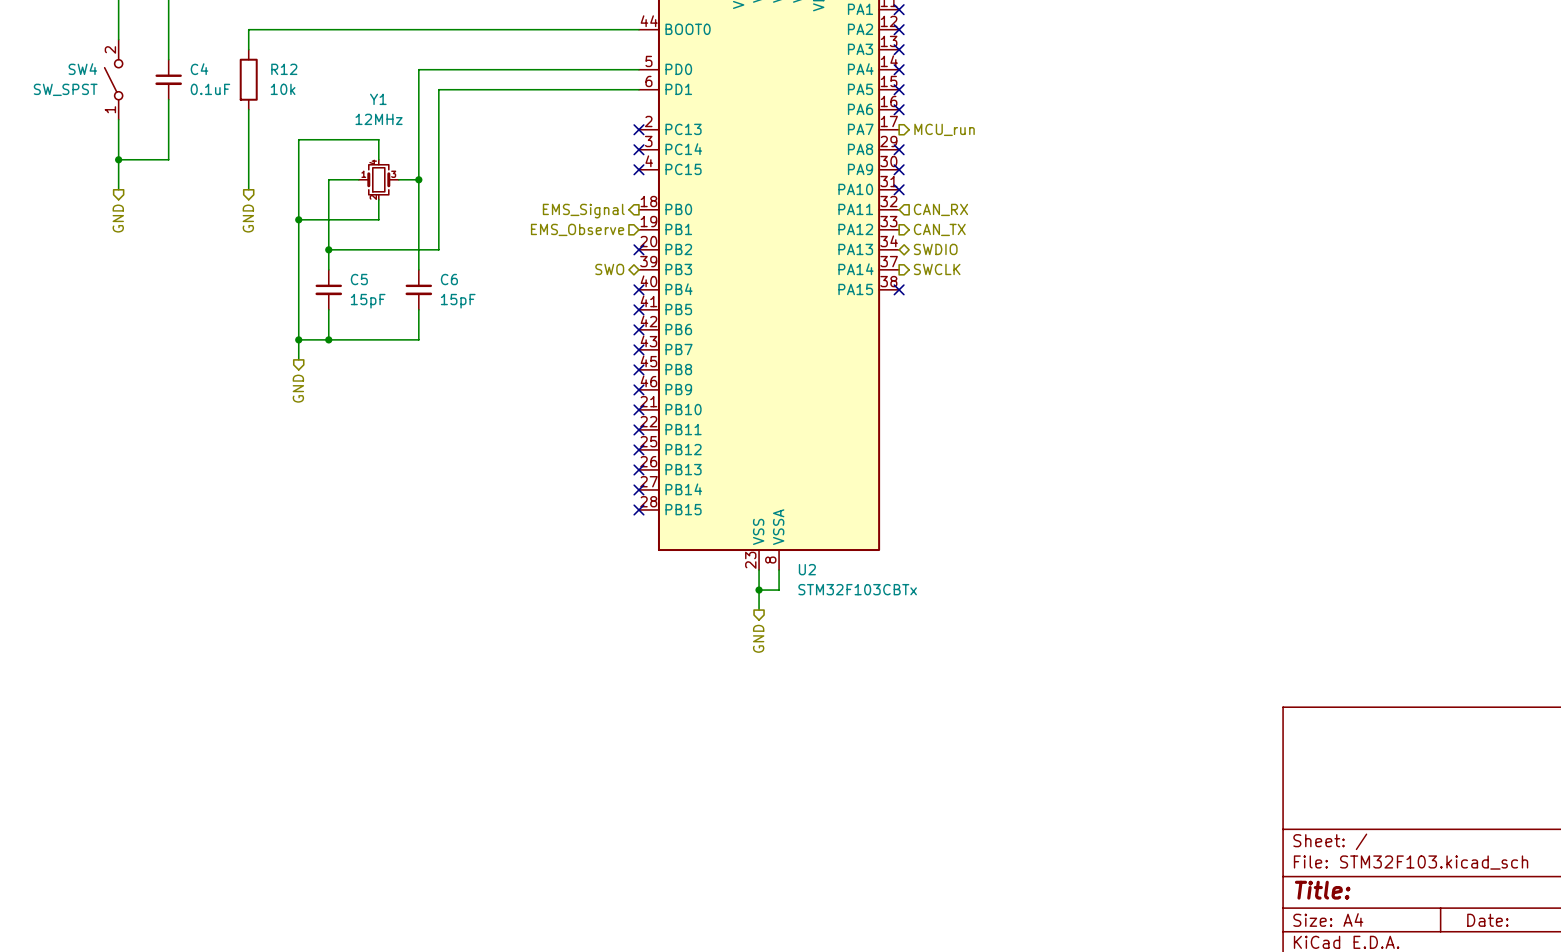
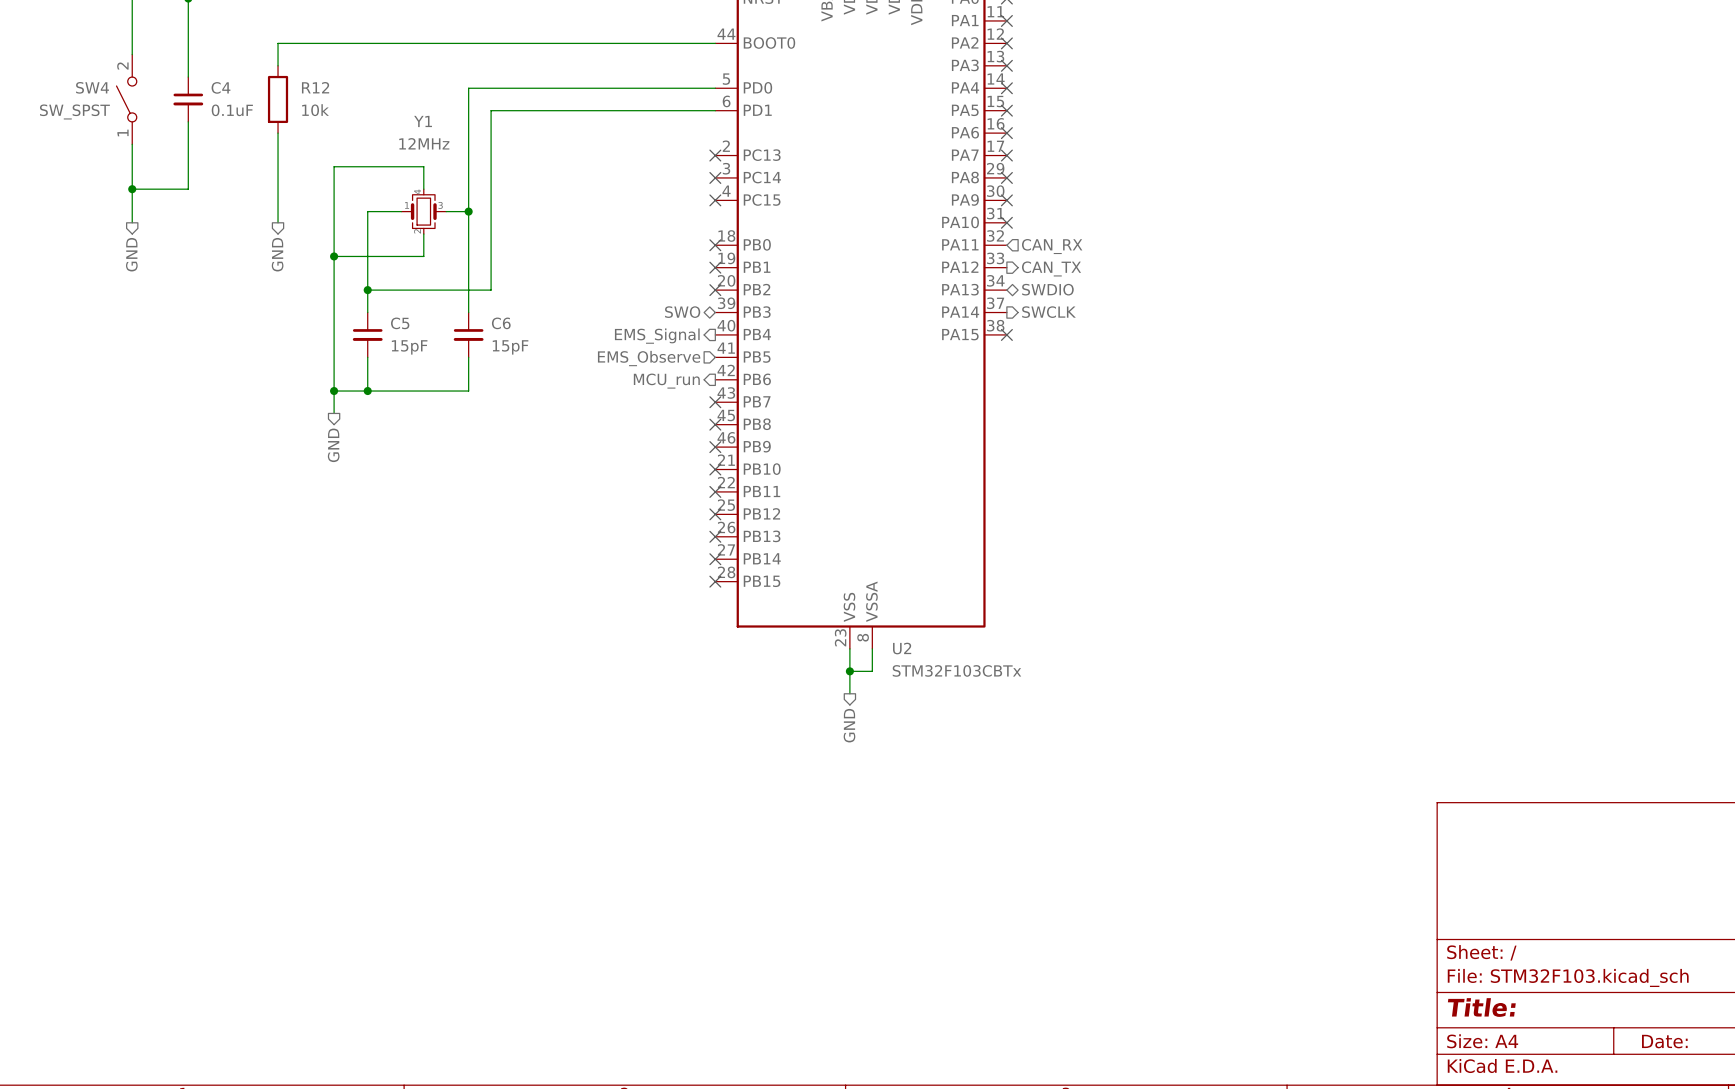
no-connect mark: none -> (1006, 155)
hierarchical label: MCU_run (944, 129) -> none
no-connect mark: none -> (715, 245)
hierarchical label position: EMS_Signal (583, 211) -> EMS_Signal (657, 336)
hierarchical label position: EMS_Observe (577, 229) -> EMS_Observe (649, 358)
no-connect mark: none -> (715, 267)
no-connect mark: (638, 289) -> none
no-connect mark: (638, 309) -> none
hierarchical label: none -> MCU_run (666, 381)
no-connect mark: (638, 329) -> none

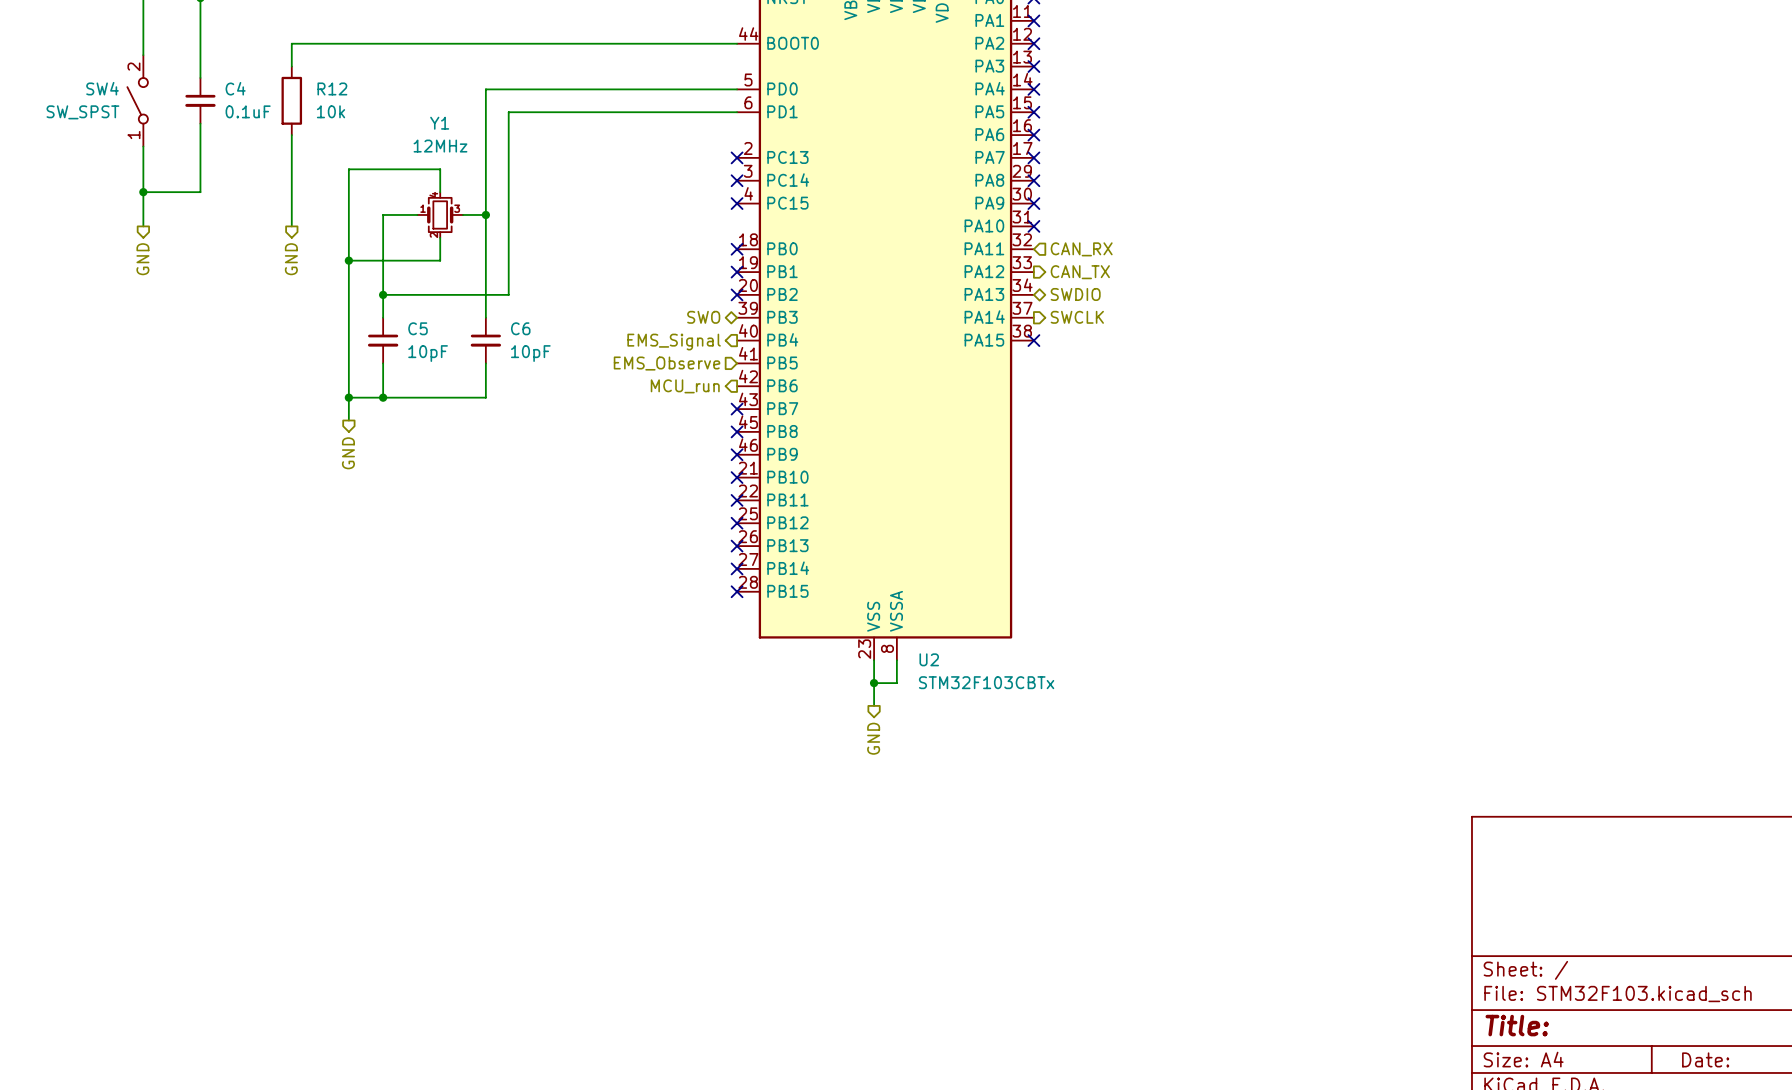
C5 value: 15pF (409, 347) -> 10pF (428, 353)
C6 value: 15pF (510, 347) -> 10pF (530, 353)

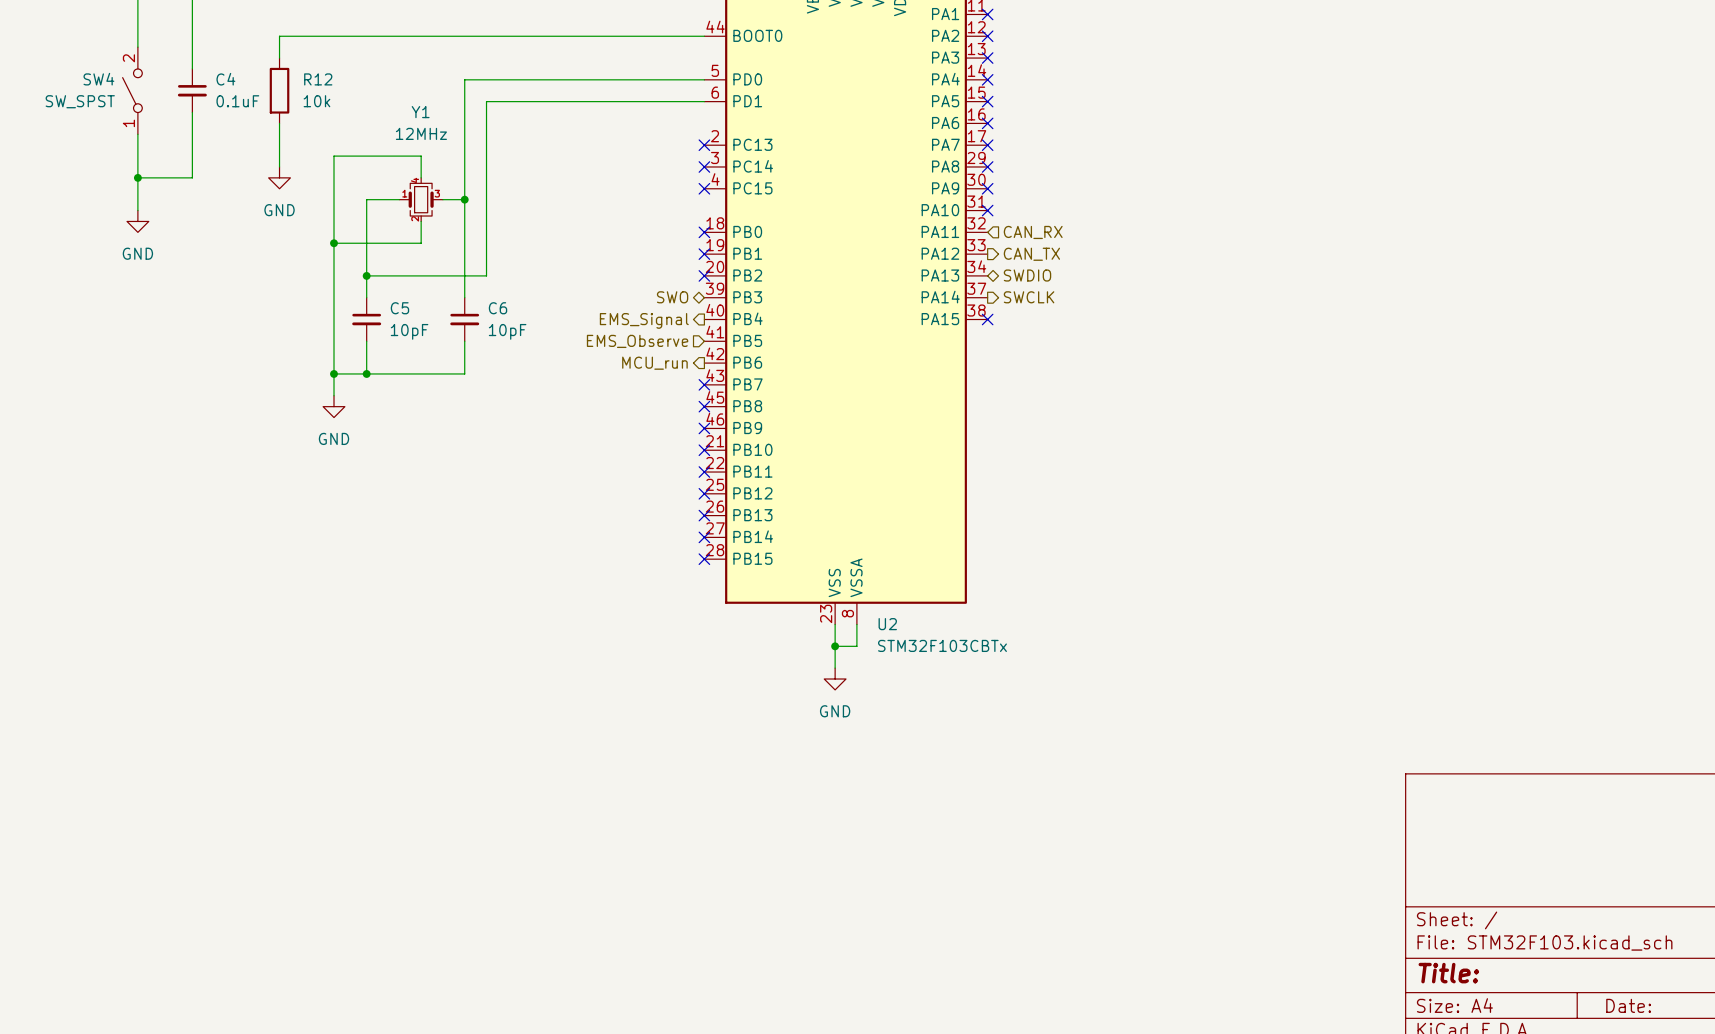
wire: (291, 180) (291, 226) -> none
power symbol: none -> GND (279, 177)
power symbol: none -> GND (137, 221)
hierarchical label: GND (142, 259) -> none
hierarchical label: GND (291, 259) -> none
power symbol: none -> GND (334, 406)
hierarchical label: GND (348, 453) -> none
power symbol: none -> GND (835, 679)
hierarchical label: GND (873, 738) -> none

